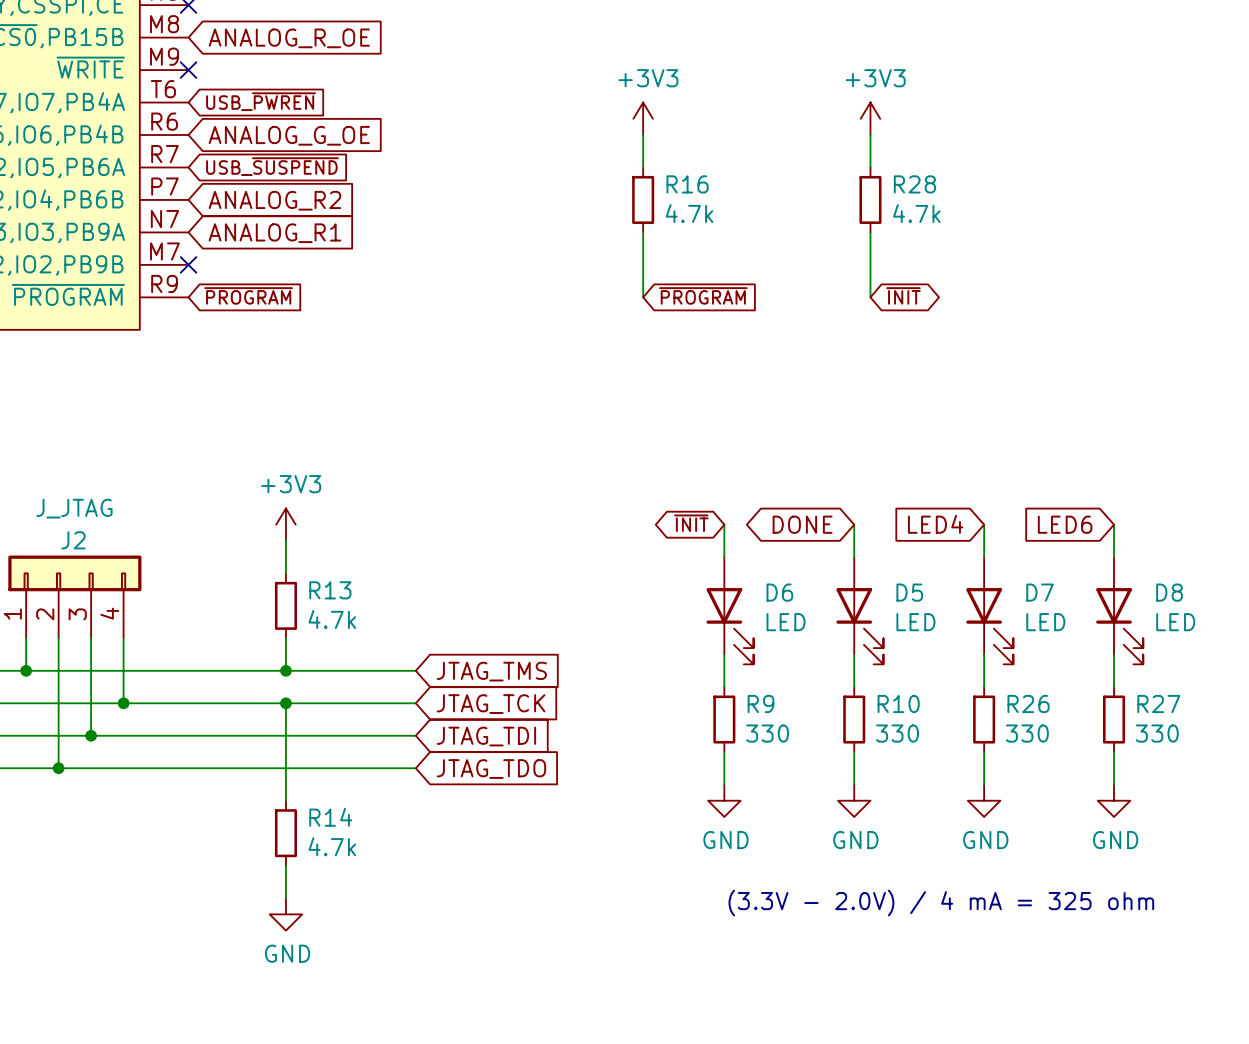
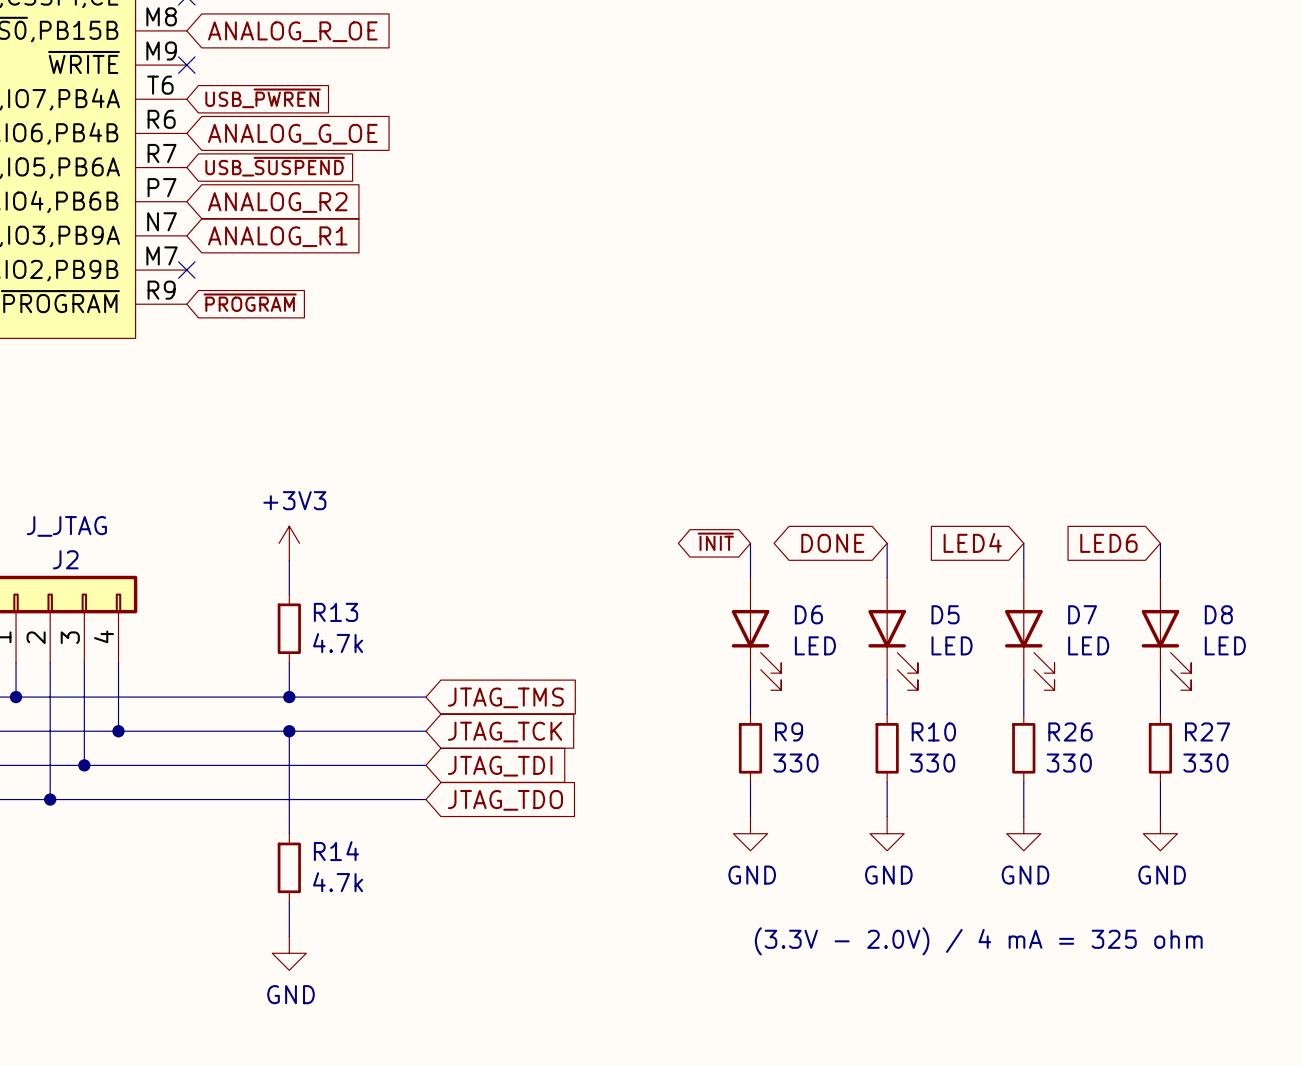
power symbol: +3V3 (643, 118) -> none
power symbol: +3V3 (870, 118) -> none
wire: (643, 135) (643, 167) -> none
wire: (870, 135) (870, 167) -> none
R16: 4.7k (643, 199) -> none
R28: 4.7k (870, 199) -> none
wire: (643, 232) (643, 297) -> none
wire: (870, 232) (870, 297) -> none
global label: ~{PROGRAM} (703, 295) -> none
global label: ~{INIT} (903, 295) -> none

